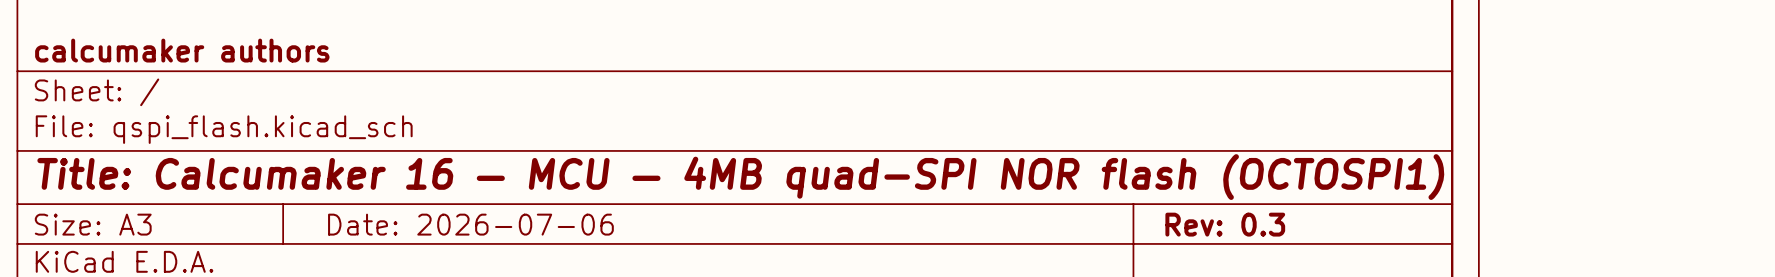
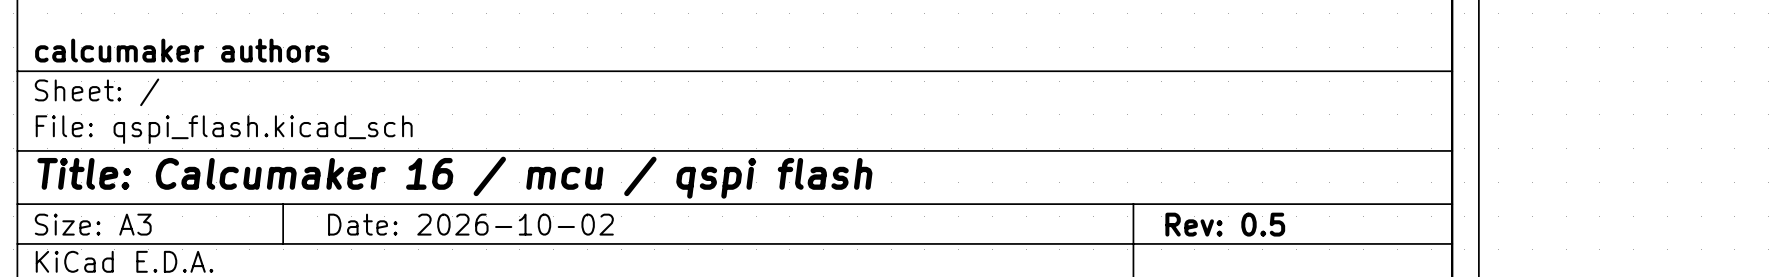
title block: Title: Calcumaker 16 — MCU — 4MB quad-SPI NOR flash (OCTOSPI1) (740, 177) -> Title: Calcumaker 16 / mcu / qspi flash (454, 177)
title block: Date: 2026-07-06 (470, 224) -> Date: 2026-10-02 (470, 224)
title block: Rev: 0.3 (1225, 224) -> Rev: 0.5 (1225, 224)

